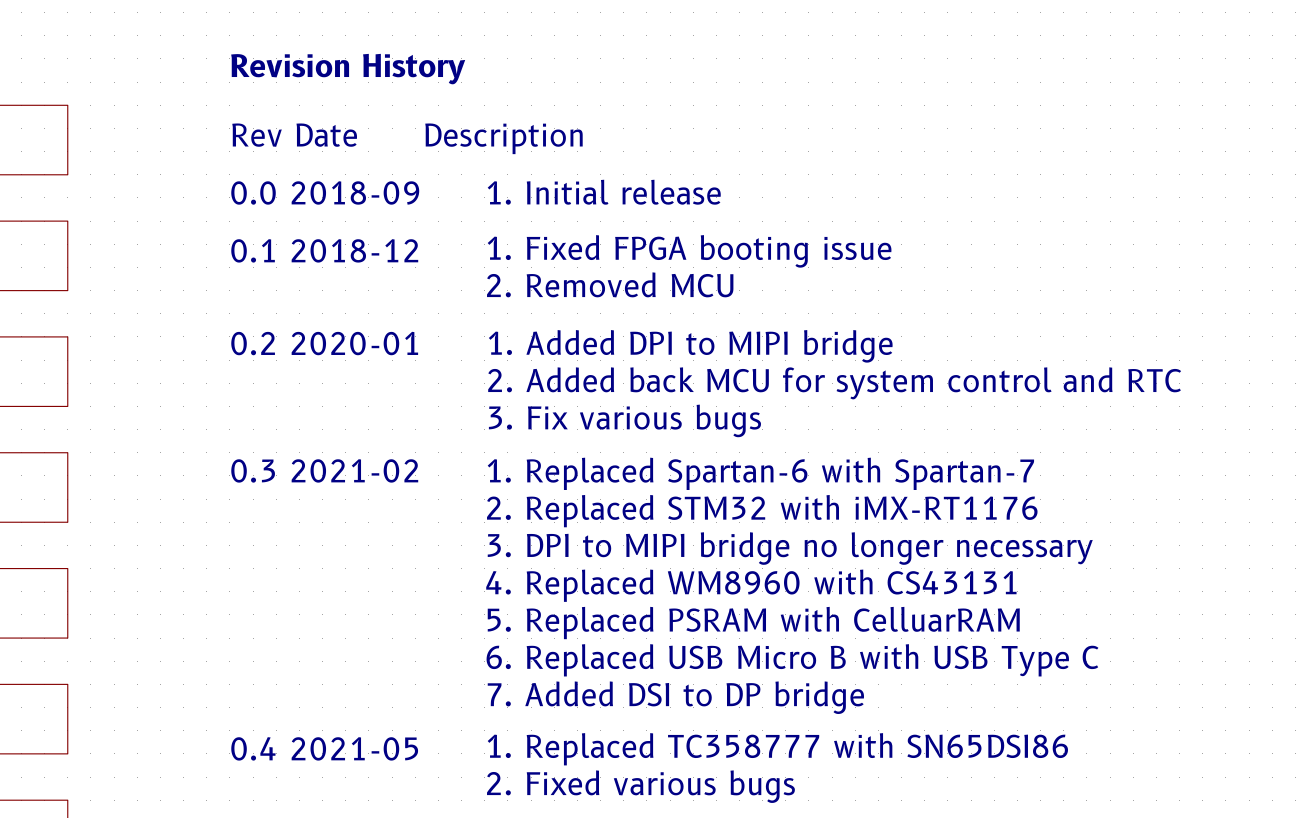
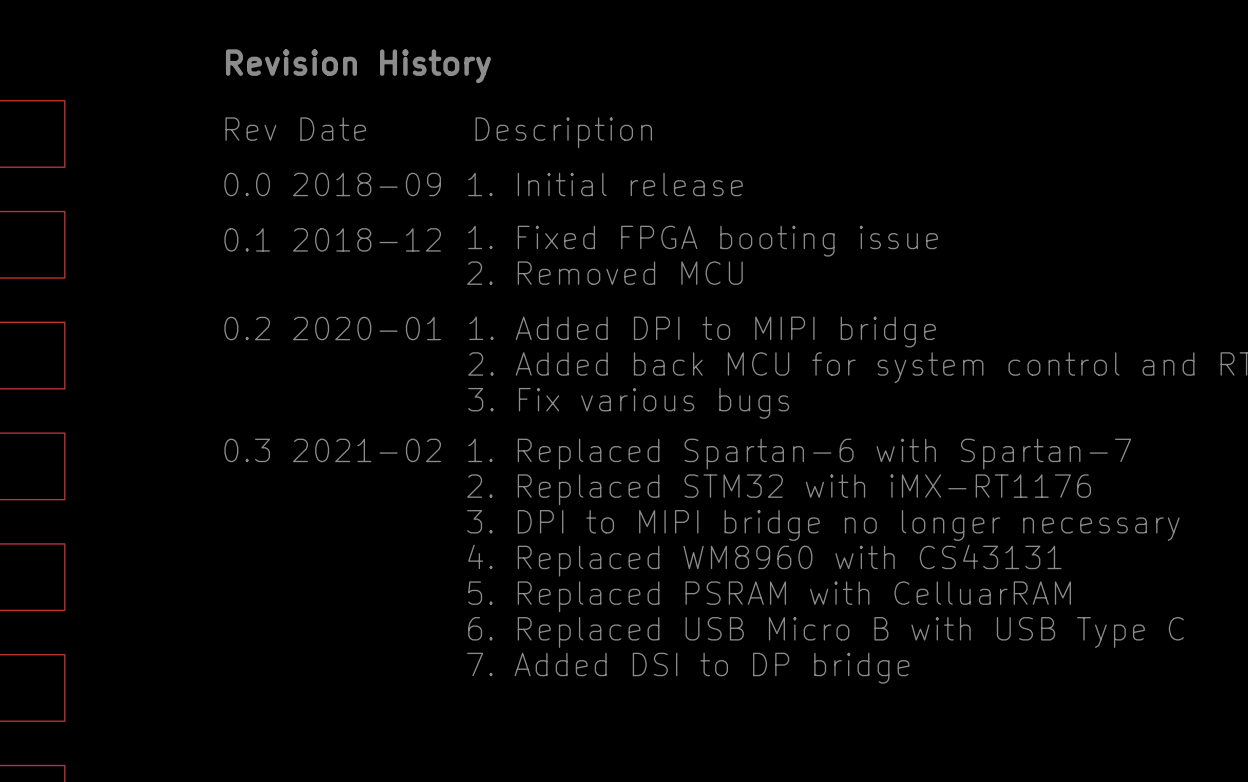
text: 0.4 2021-05 (324, 748) -> none
text: 1. Replaced TC358777 with SN65DSI86 (777, 749) -> none
text: 2. Fixed various bugs (640, 786) -> none

